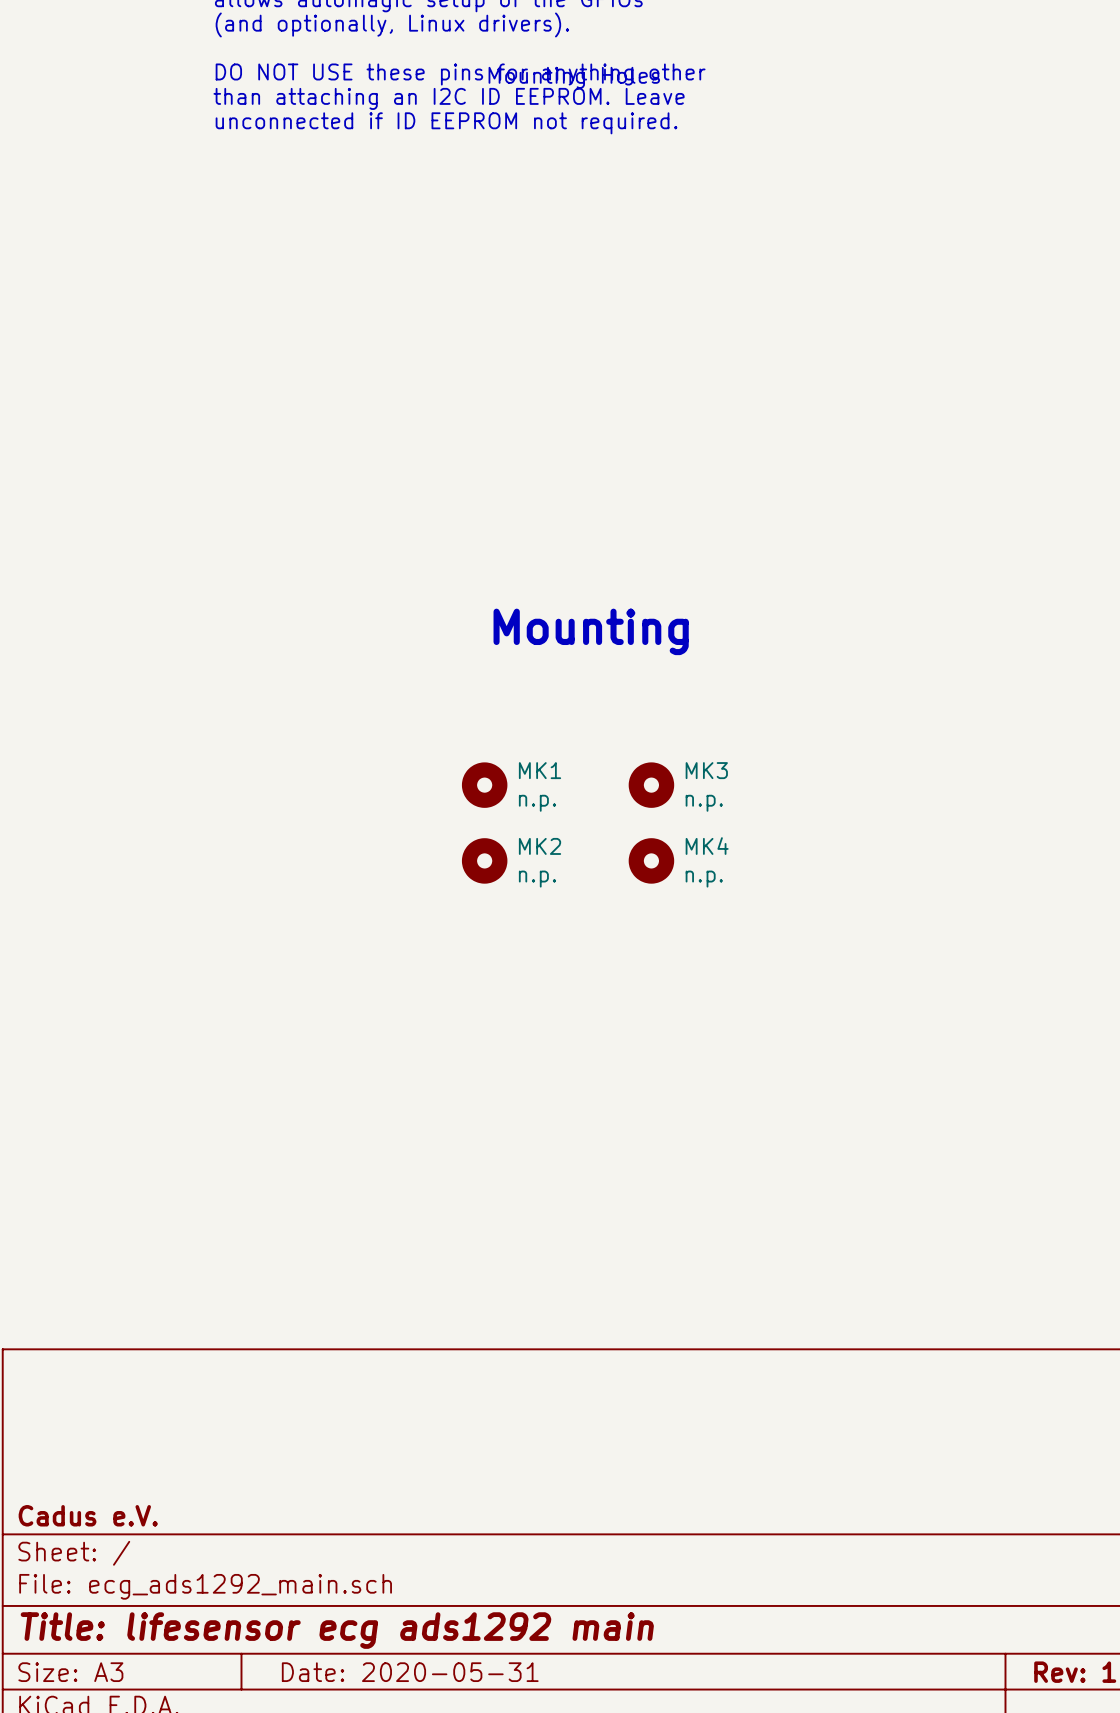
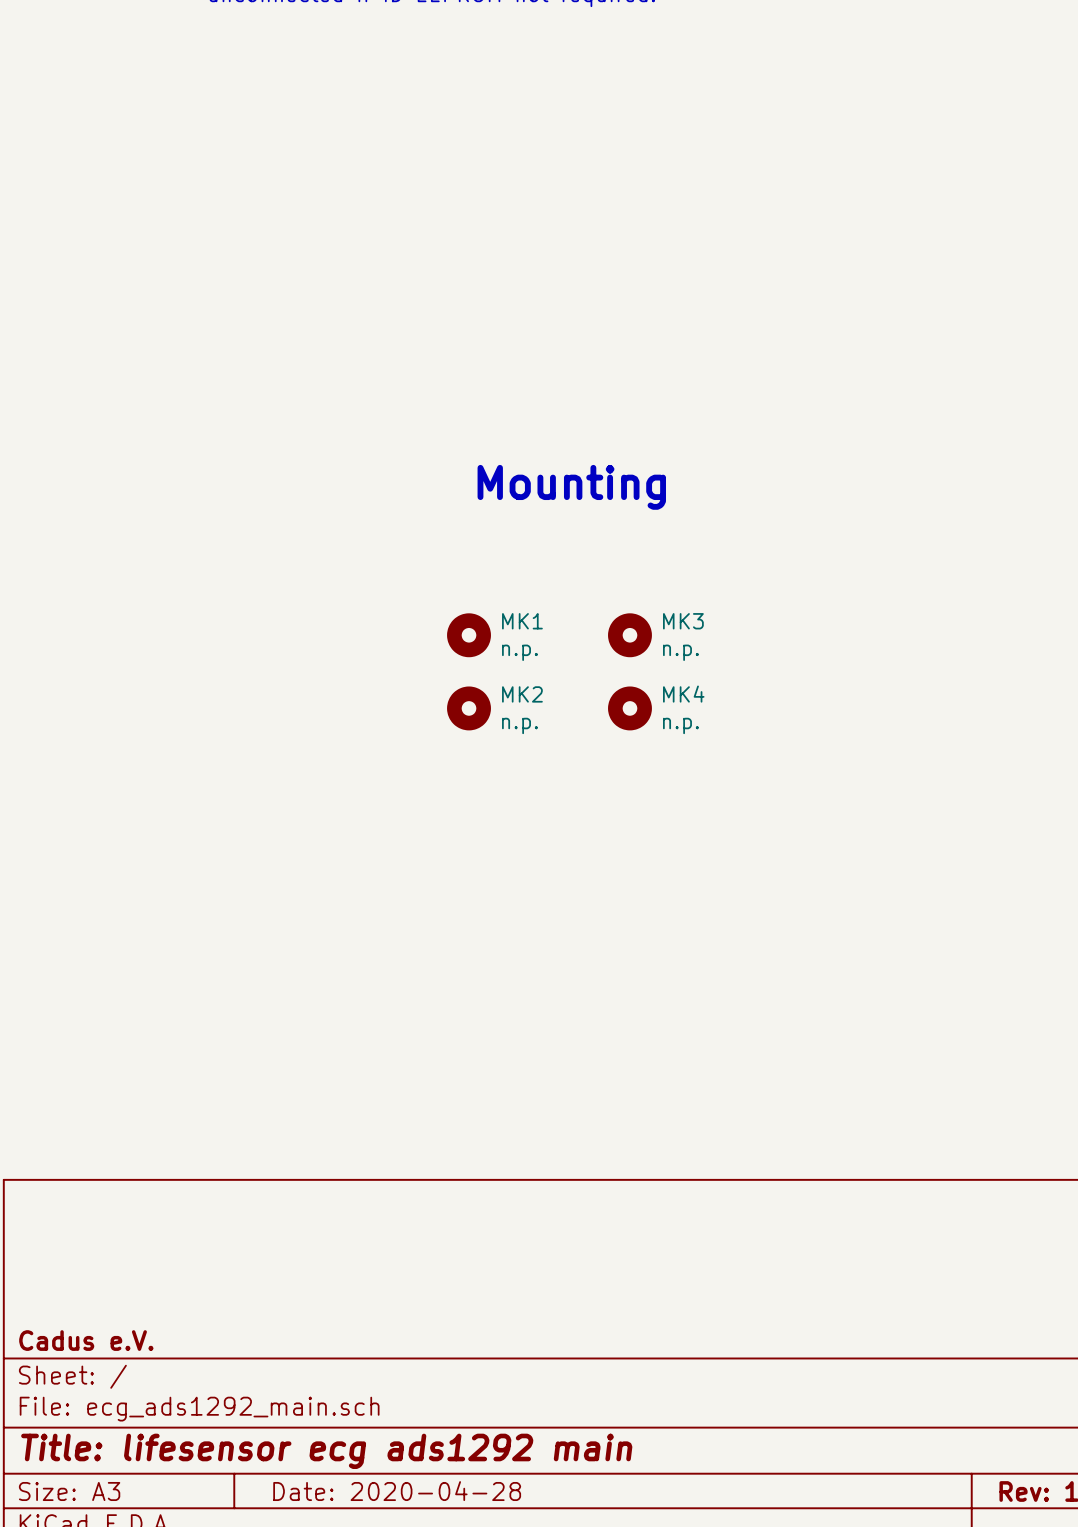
title block: Date: 2020-05-31 (410, 1672) -> Date: 2020-04-28 (397, 1491)

